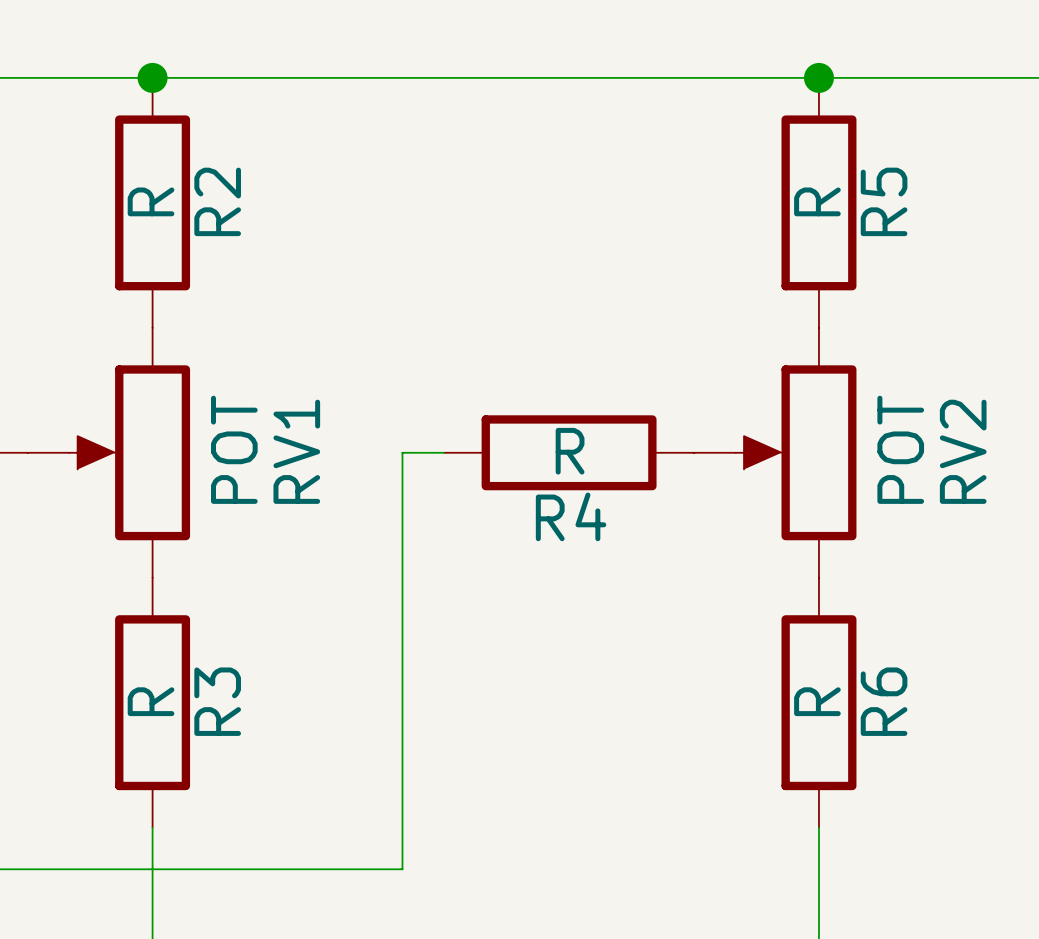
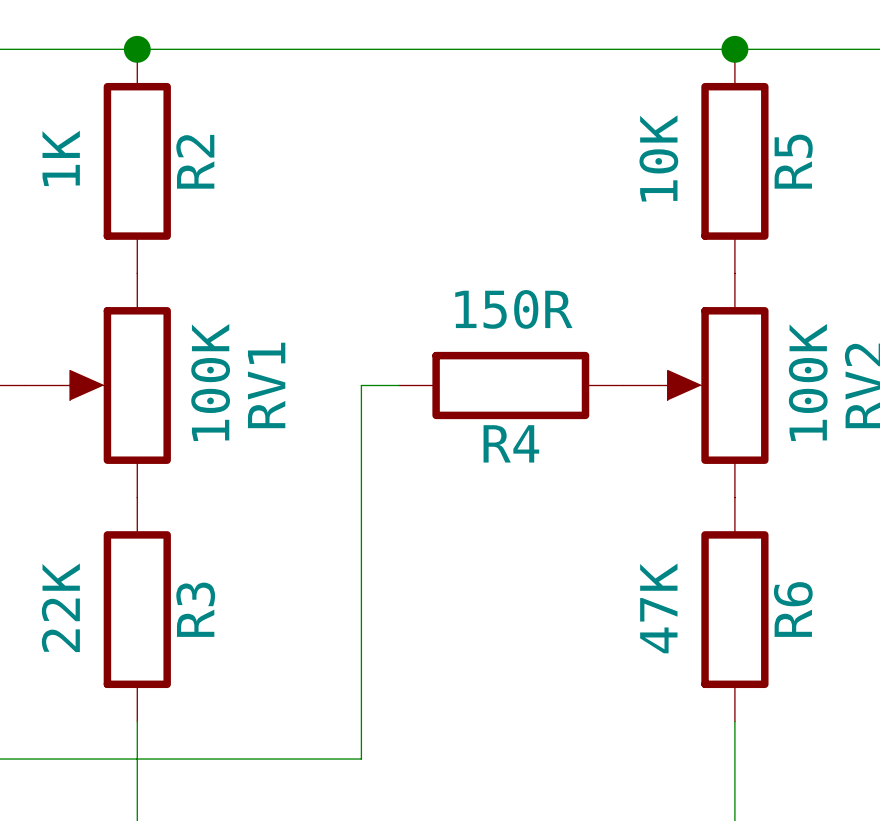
R2 value: R (151, 201) -> 1K (61, 158)
R5 value: R (817, 201) -> 10K (658, 158)
RV1 value: POT (234, 449) -> 100K (210, 382)
RV2 value: POT (900, 449) -> 100K (808, 382)
R4 value: R (570, 451) -> 150R (513, 309)
R3 value: R (151, 701) -> 22K (60, 607)
R6 value: R (817, 701) -> 47K (658, 608)

